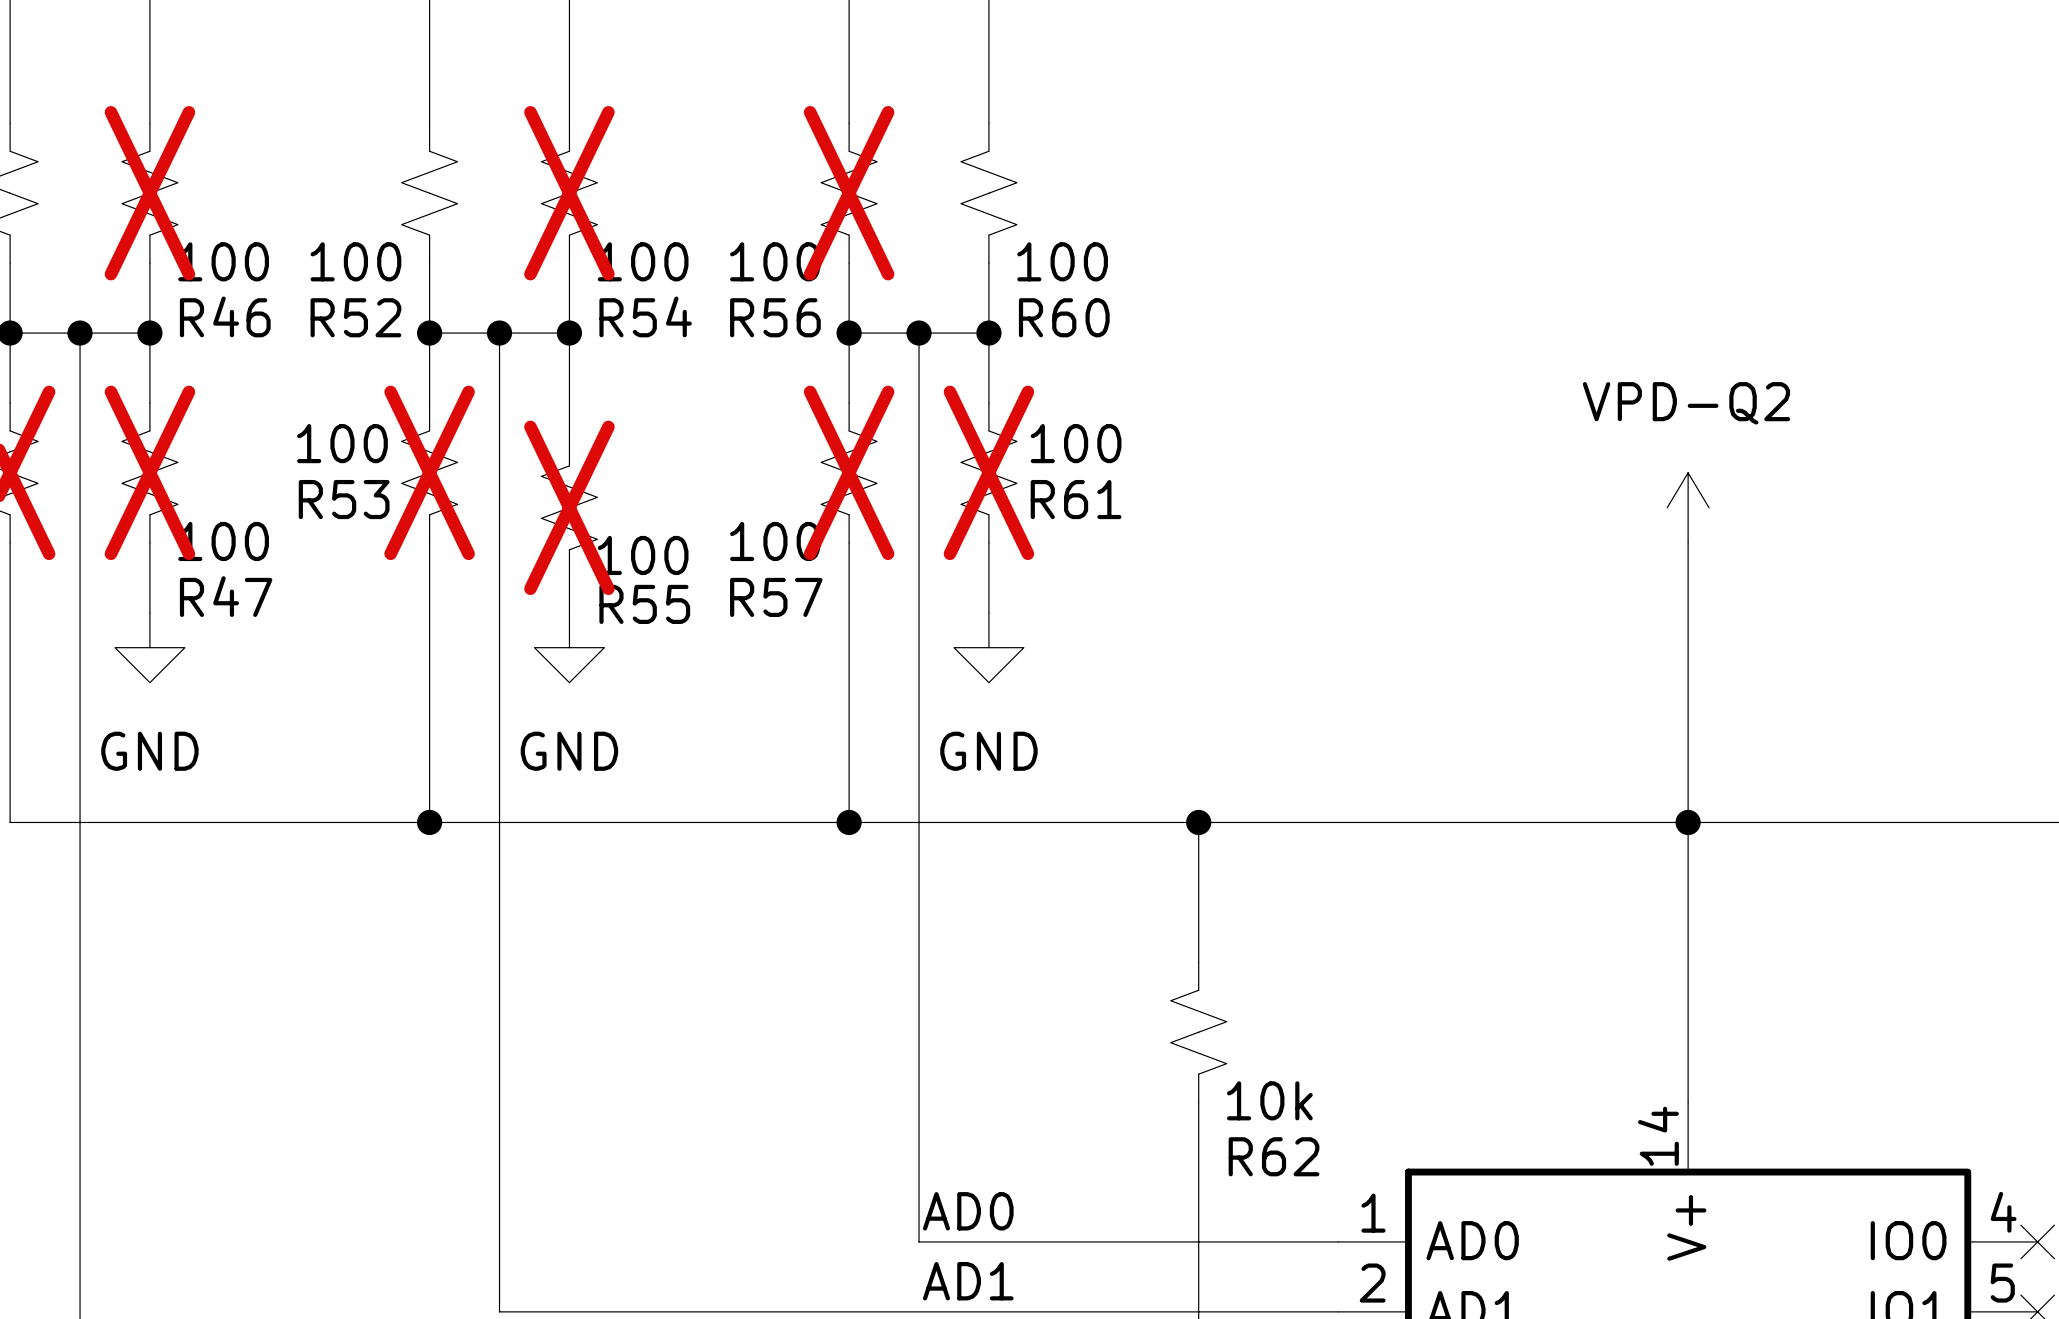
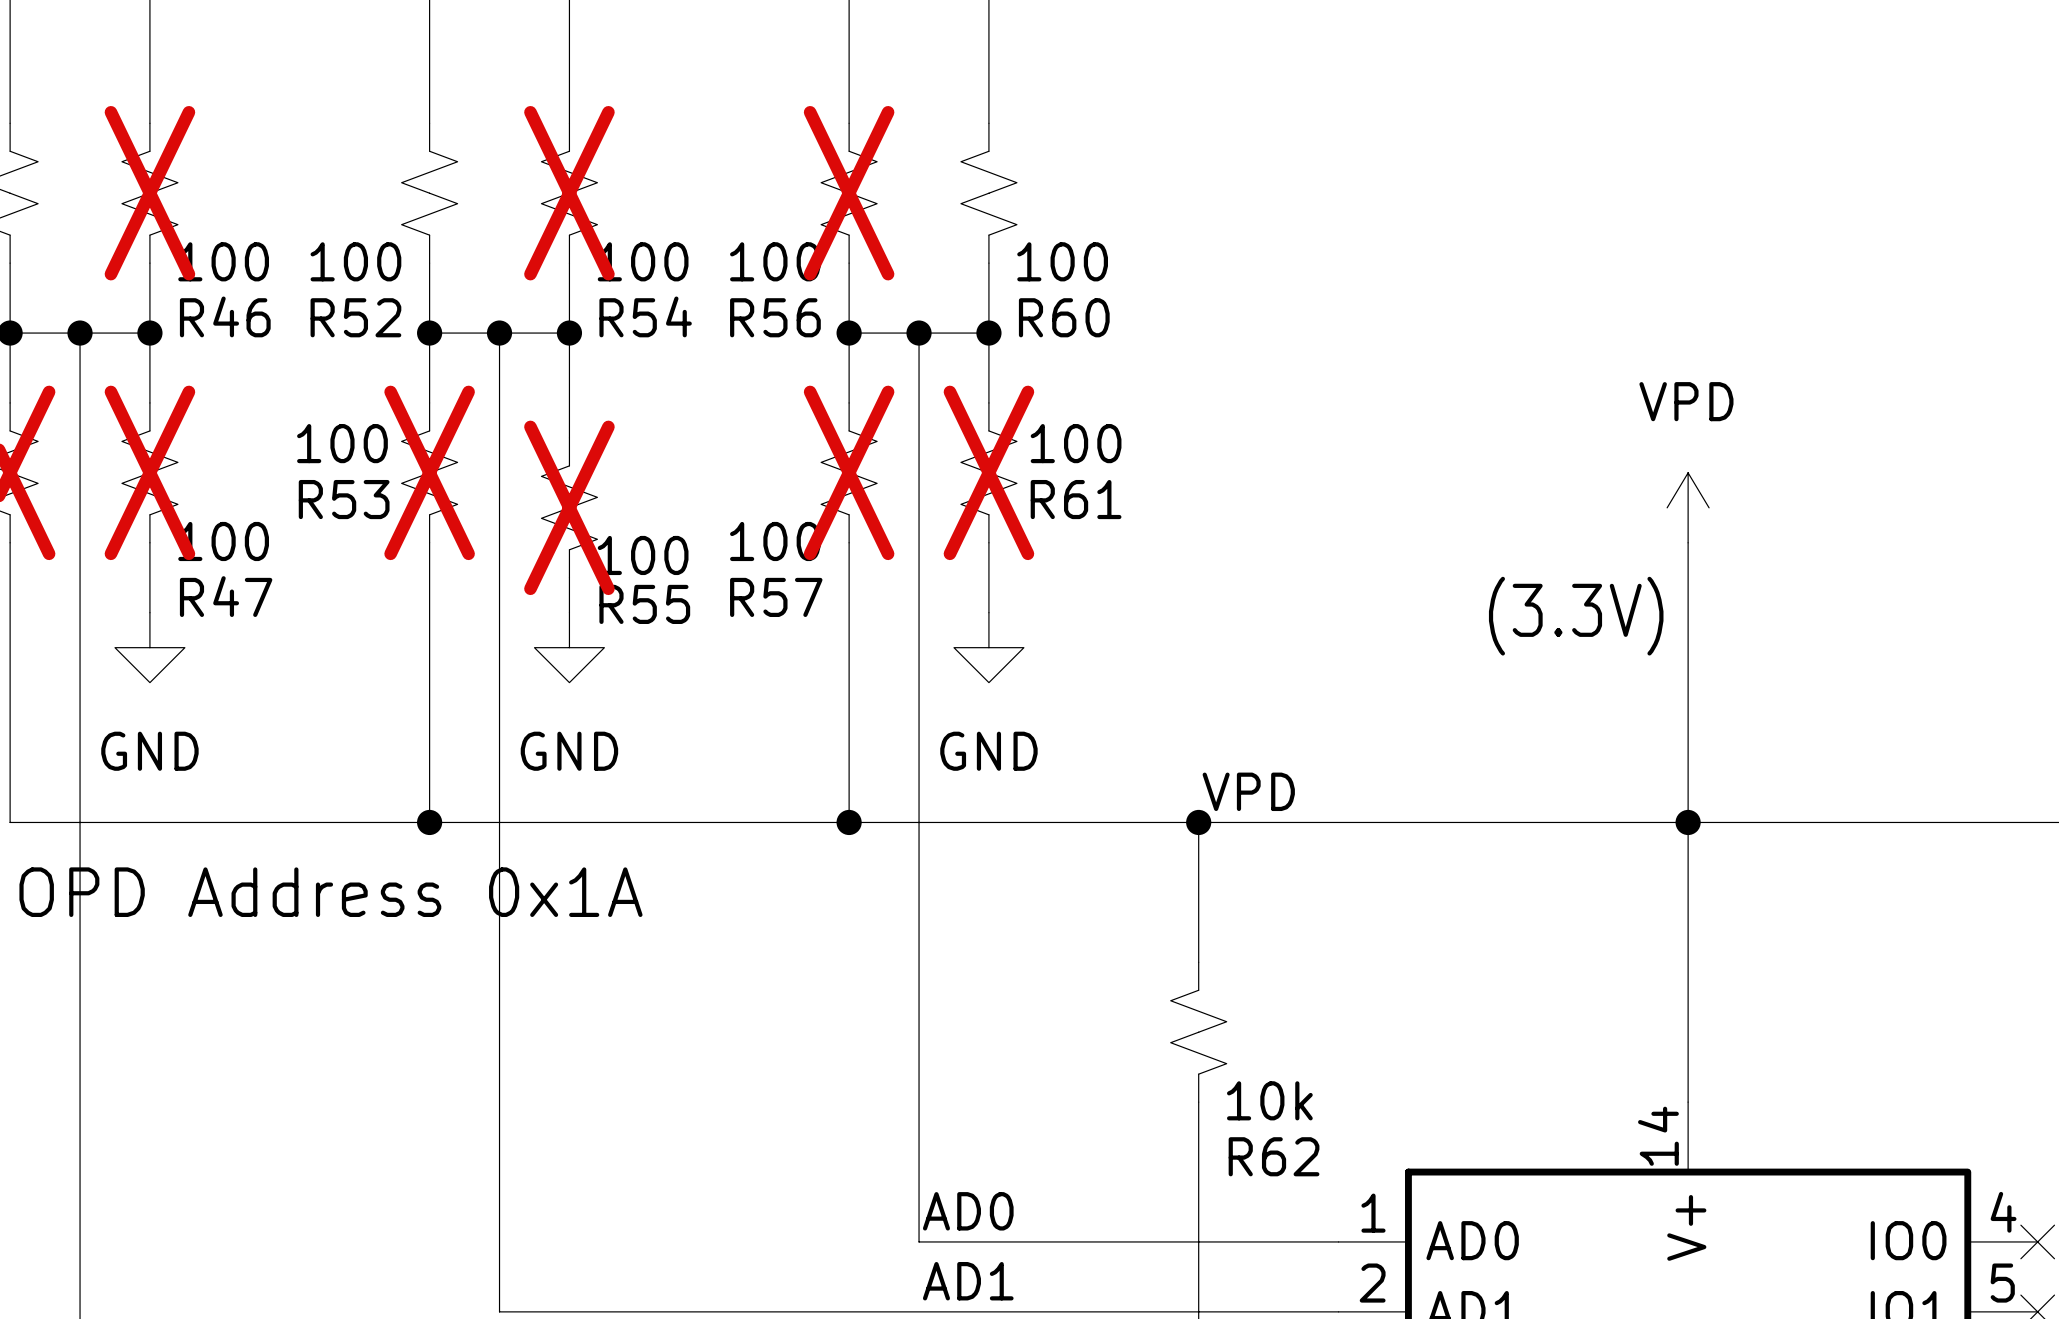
power symbol: VPD-Q2 (1688, 507) -> VPD (1688, 507)
text: none -> (3.3V) (1576, 616)
label: none -> VPD (1248, 791)
text: none -> OPD Address 0x1A (330, 892)

